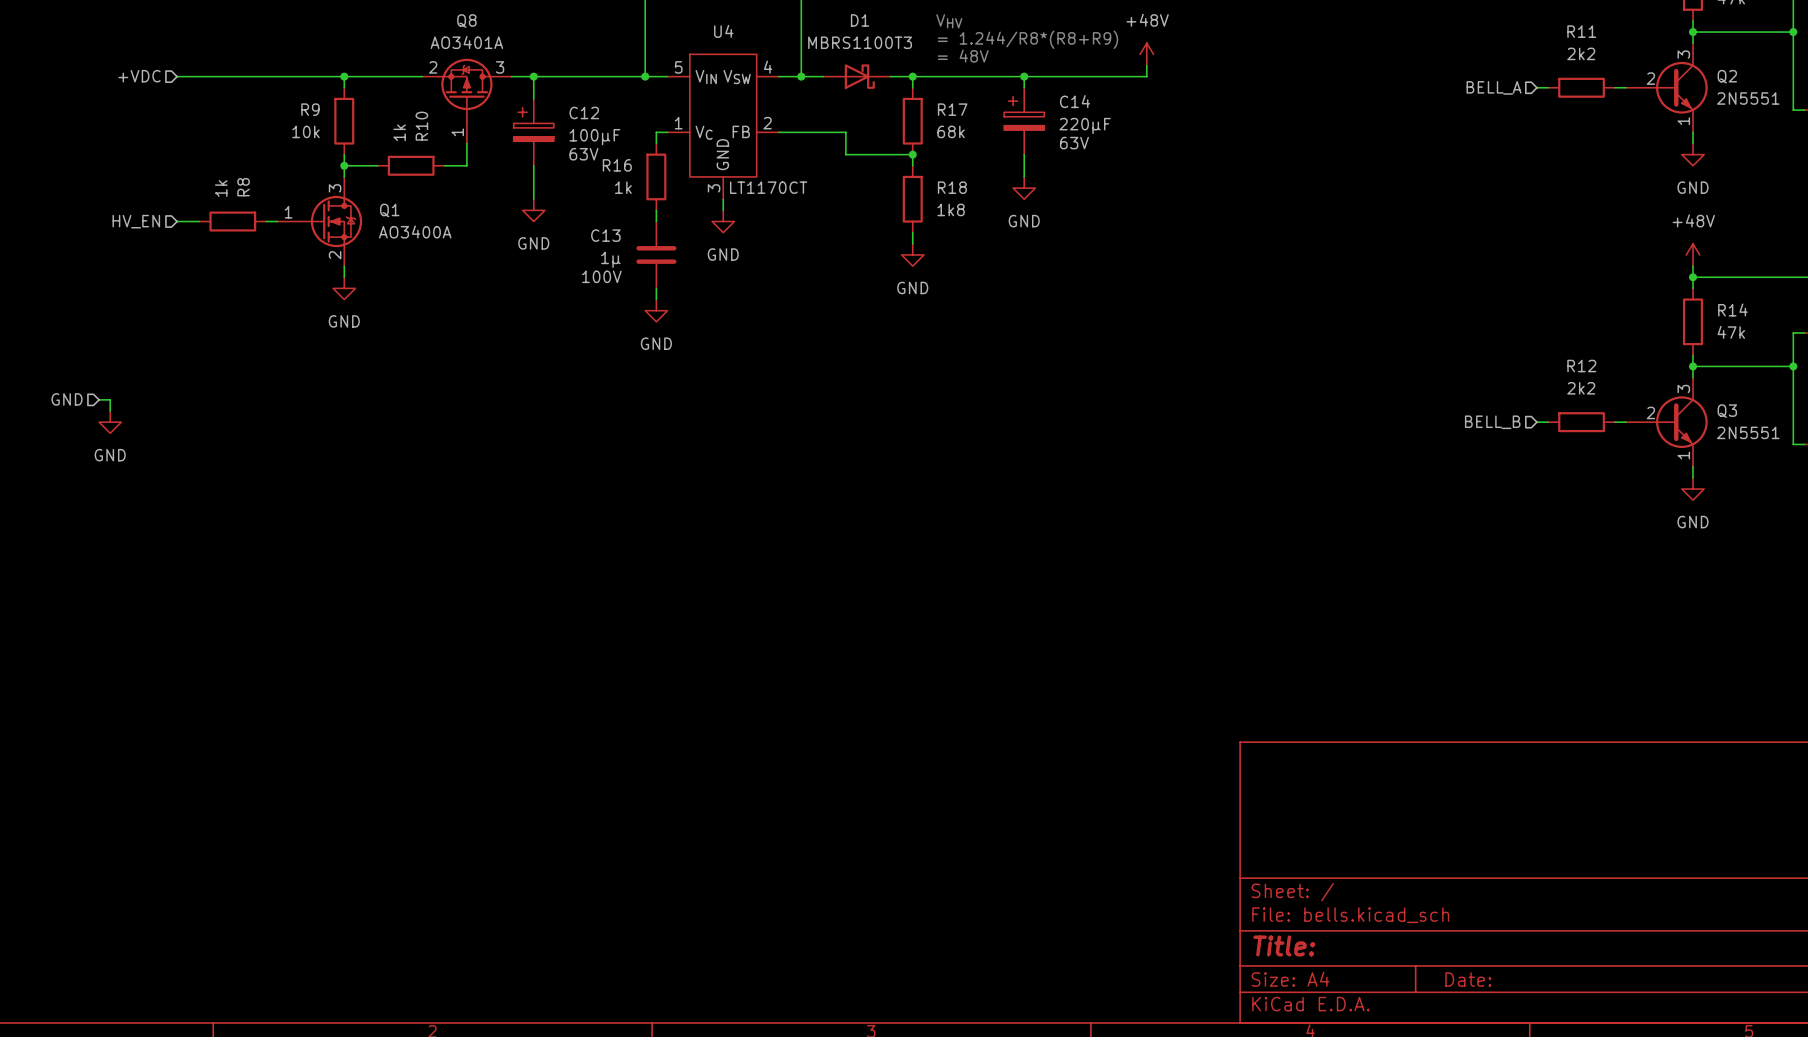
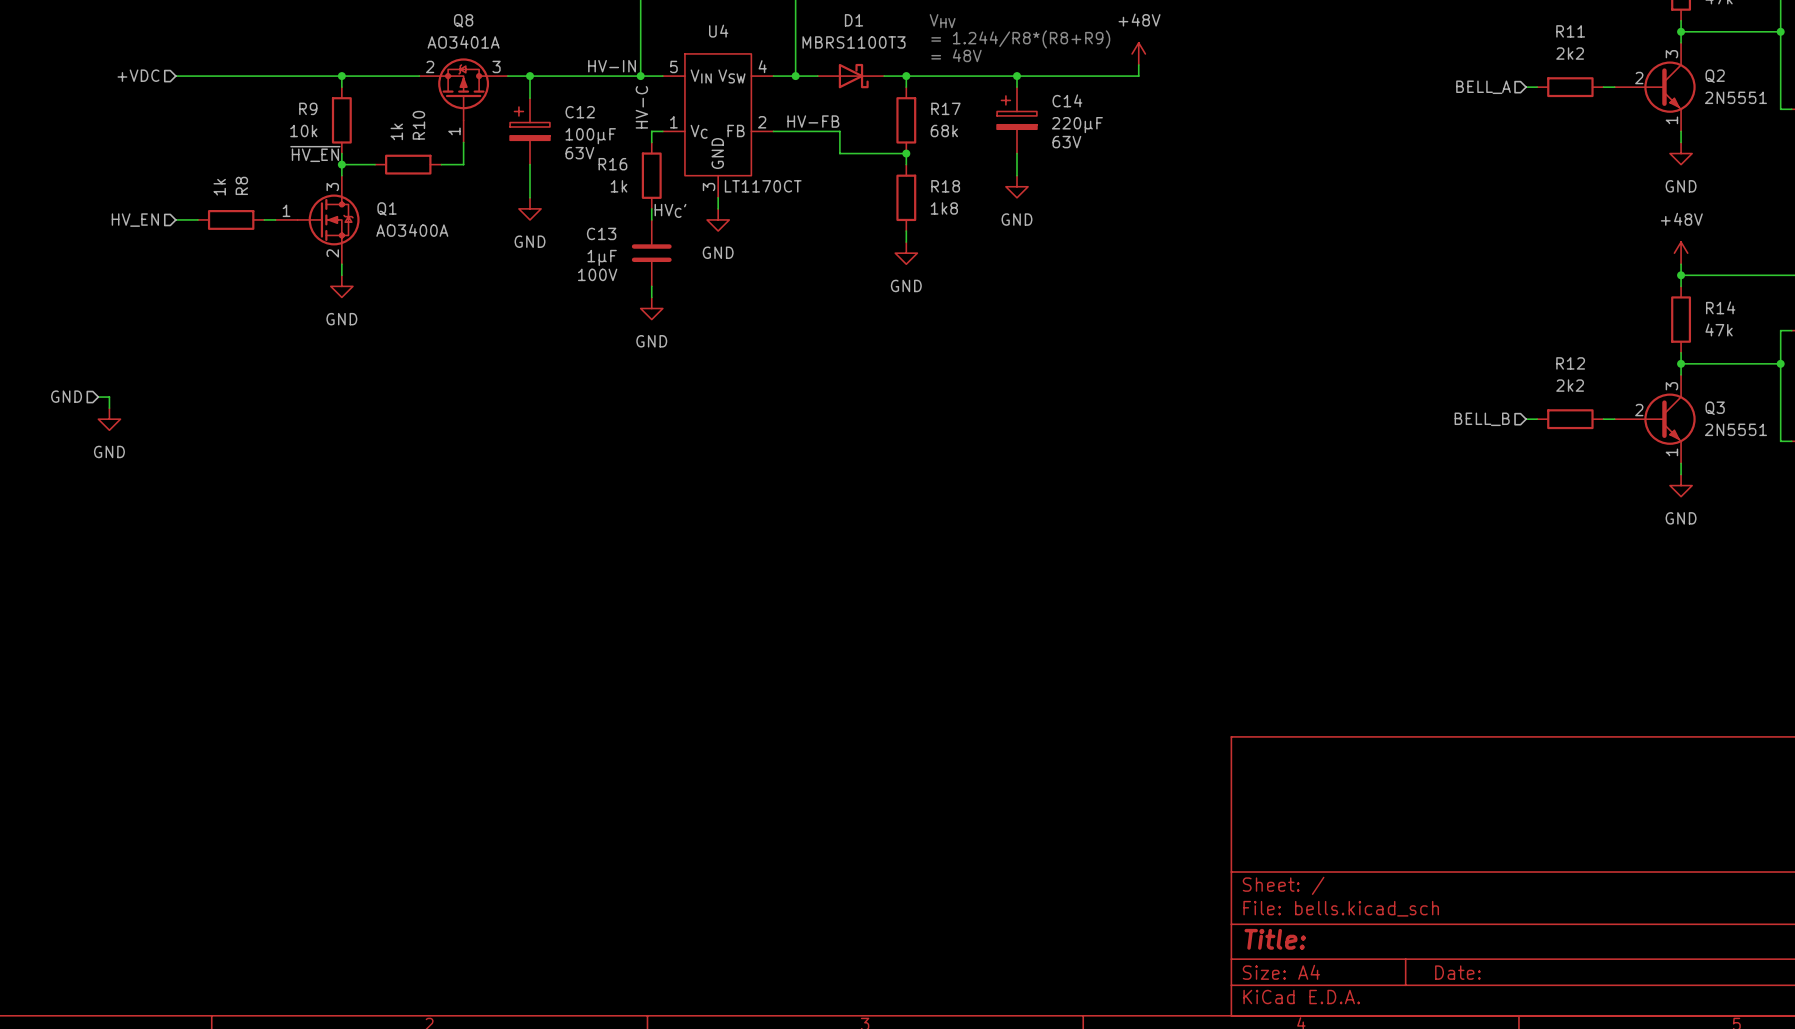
label: none -> HV-IN (612, 66)
label: none -> HV-C (641, 107)
label: none -> HV-FB (813, 121)
label: none -> ~{HV_EN} (315, 154)
label: none -> HVC' (670, 210)
C13 value: 1µ (610, 259) -> 1µF (602, 257)

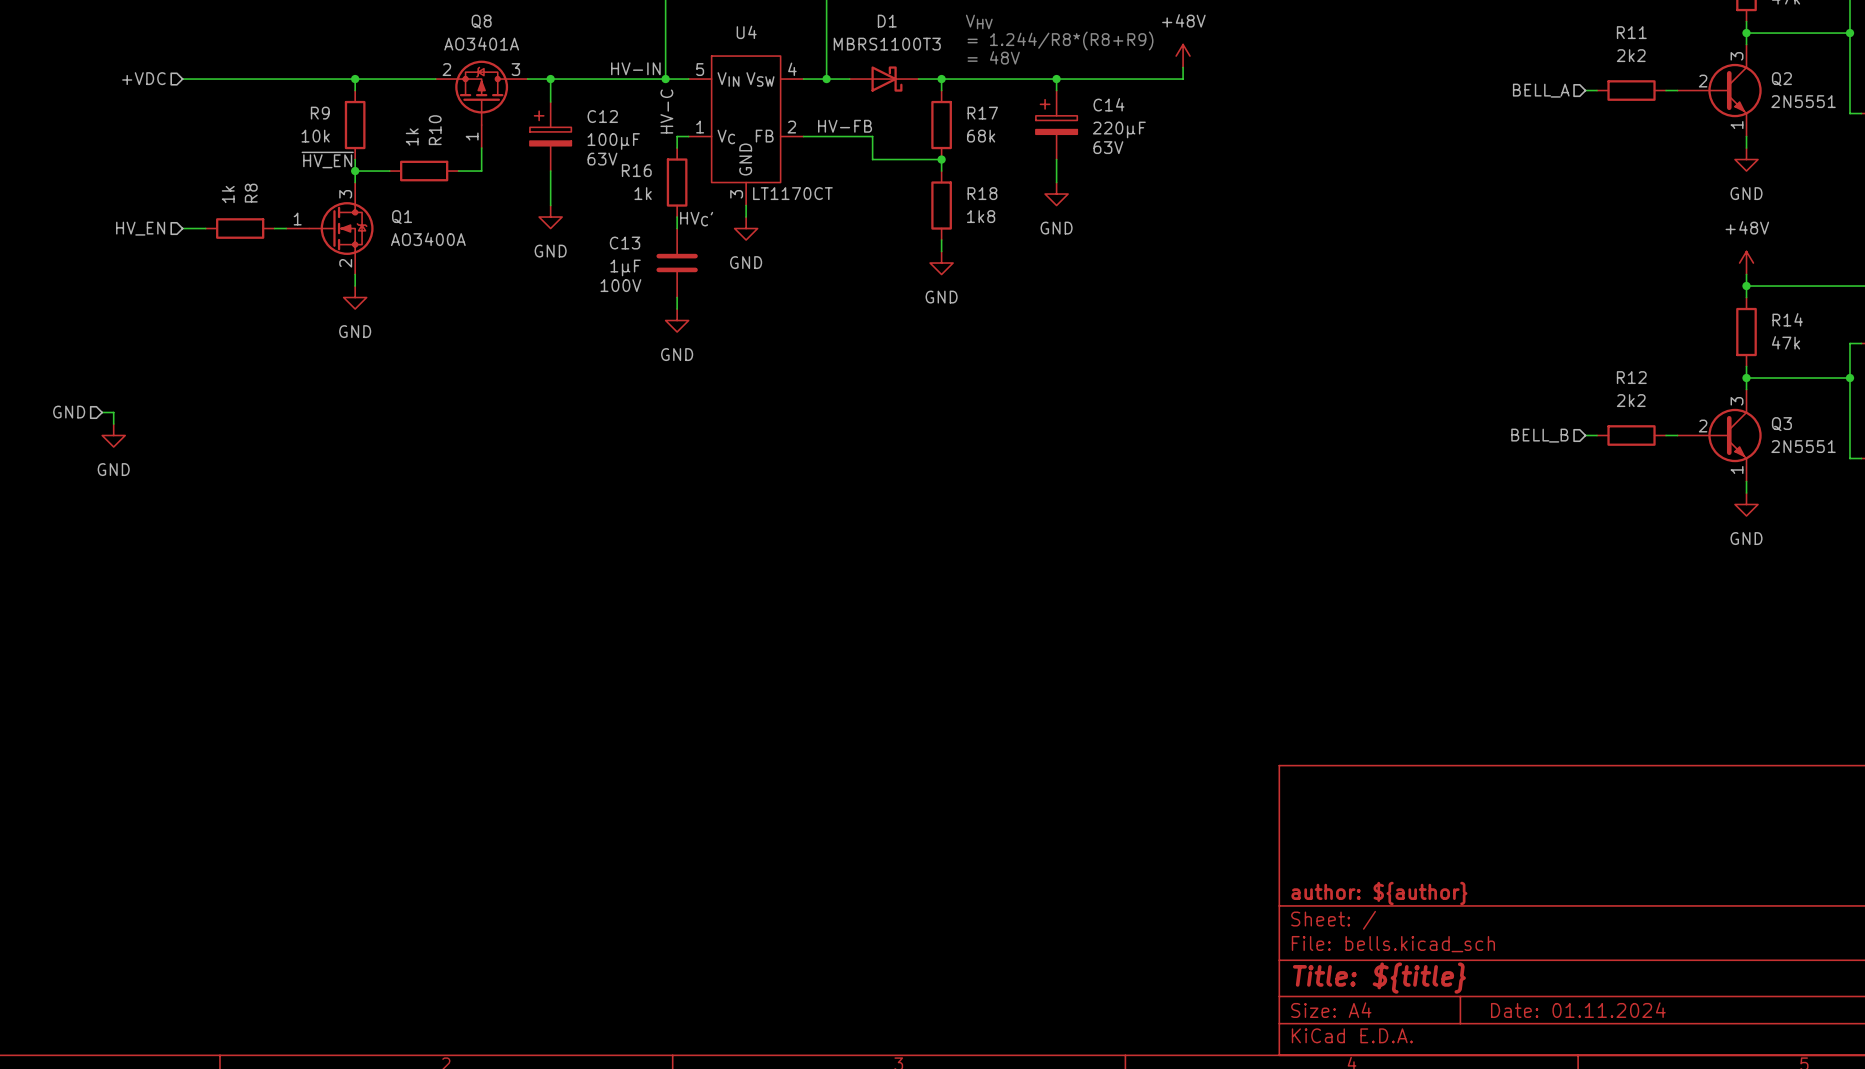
title block: none -> author: ${author} (1379, 893)
title block: Title: (1275, 939) -> Title: ${title} (1379, 978)
title block: Date: (1457, 972) -> Date: 01.11.2024 (1578, 1010)

